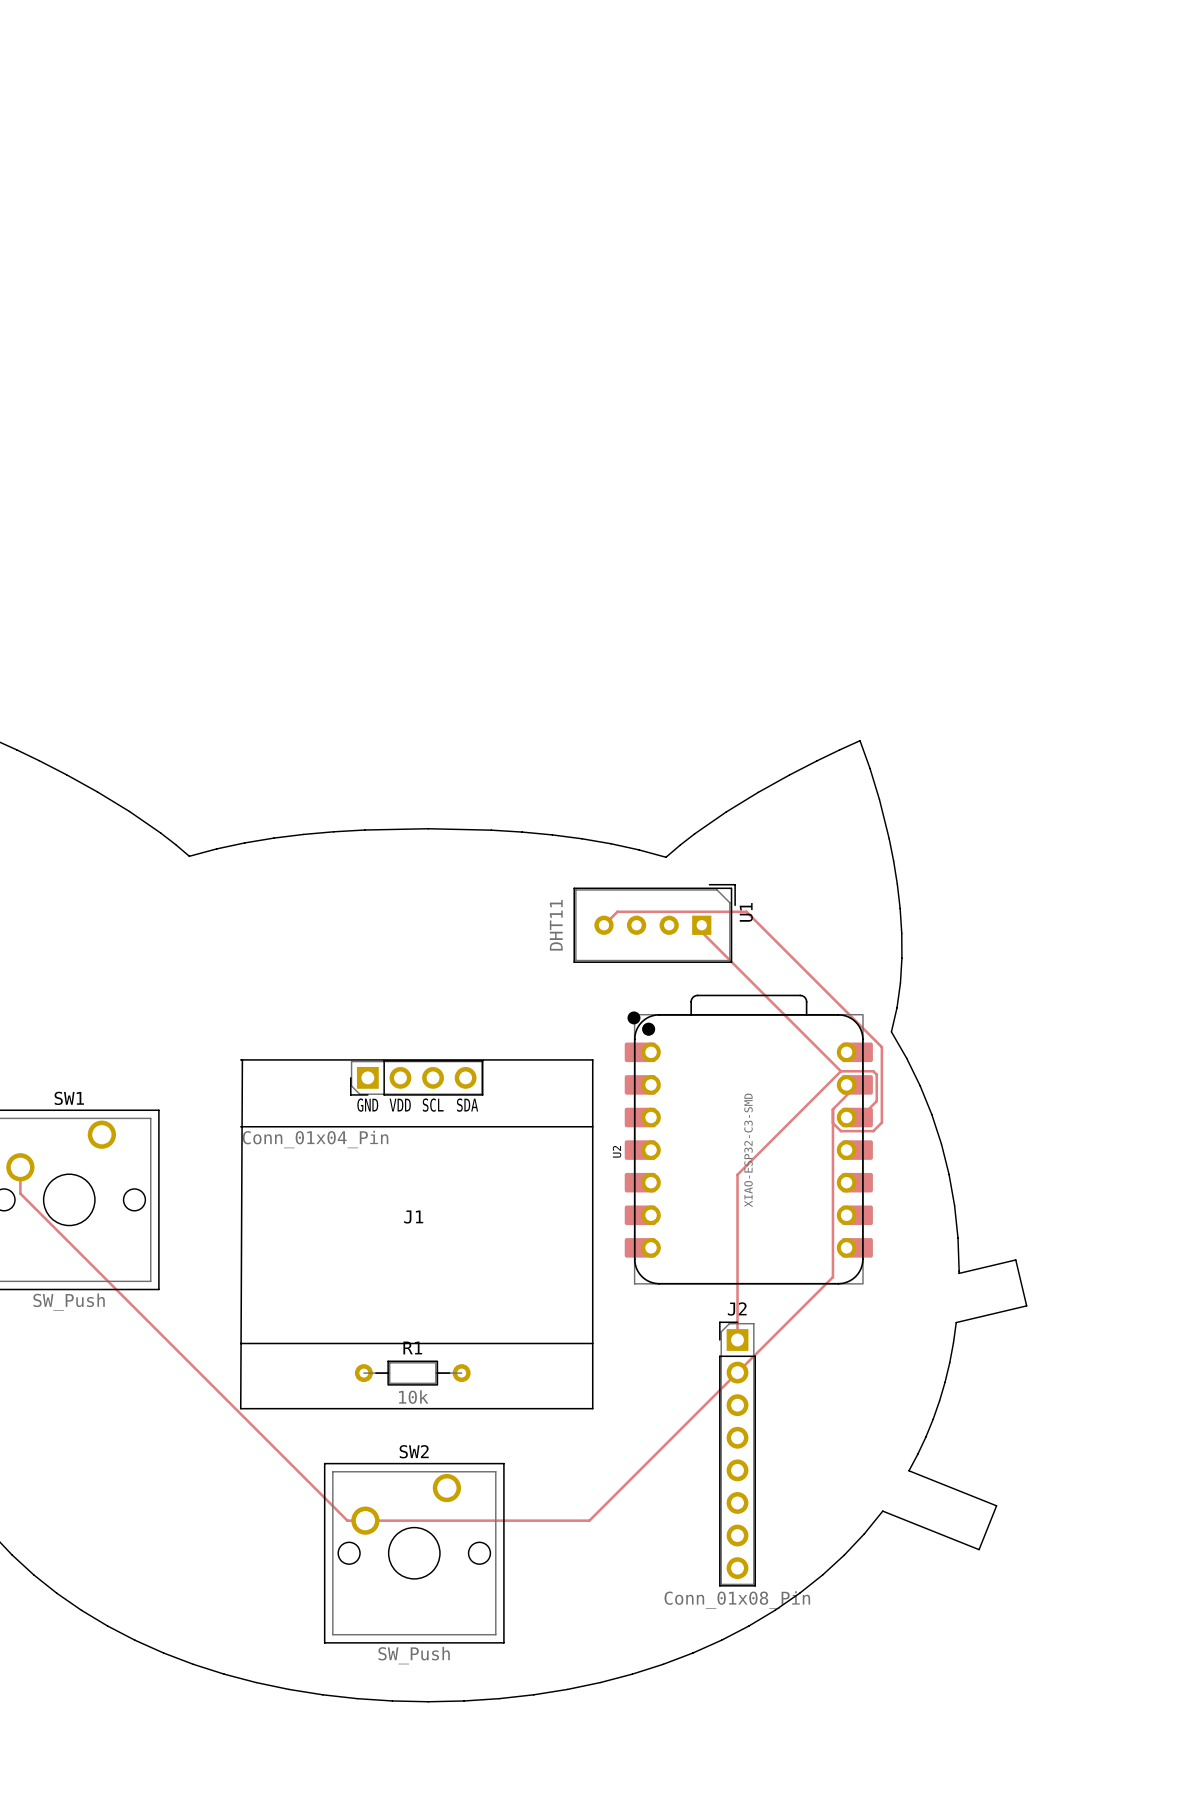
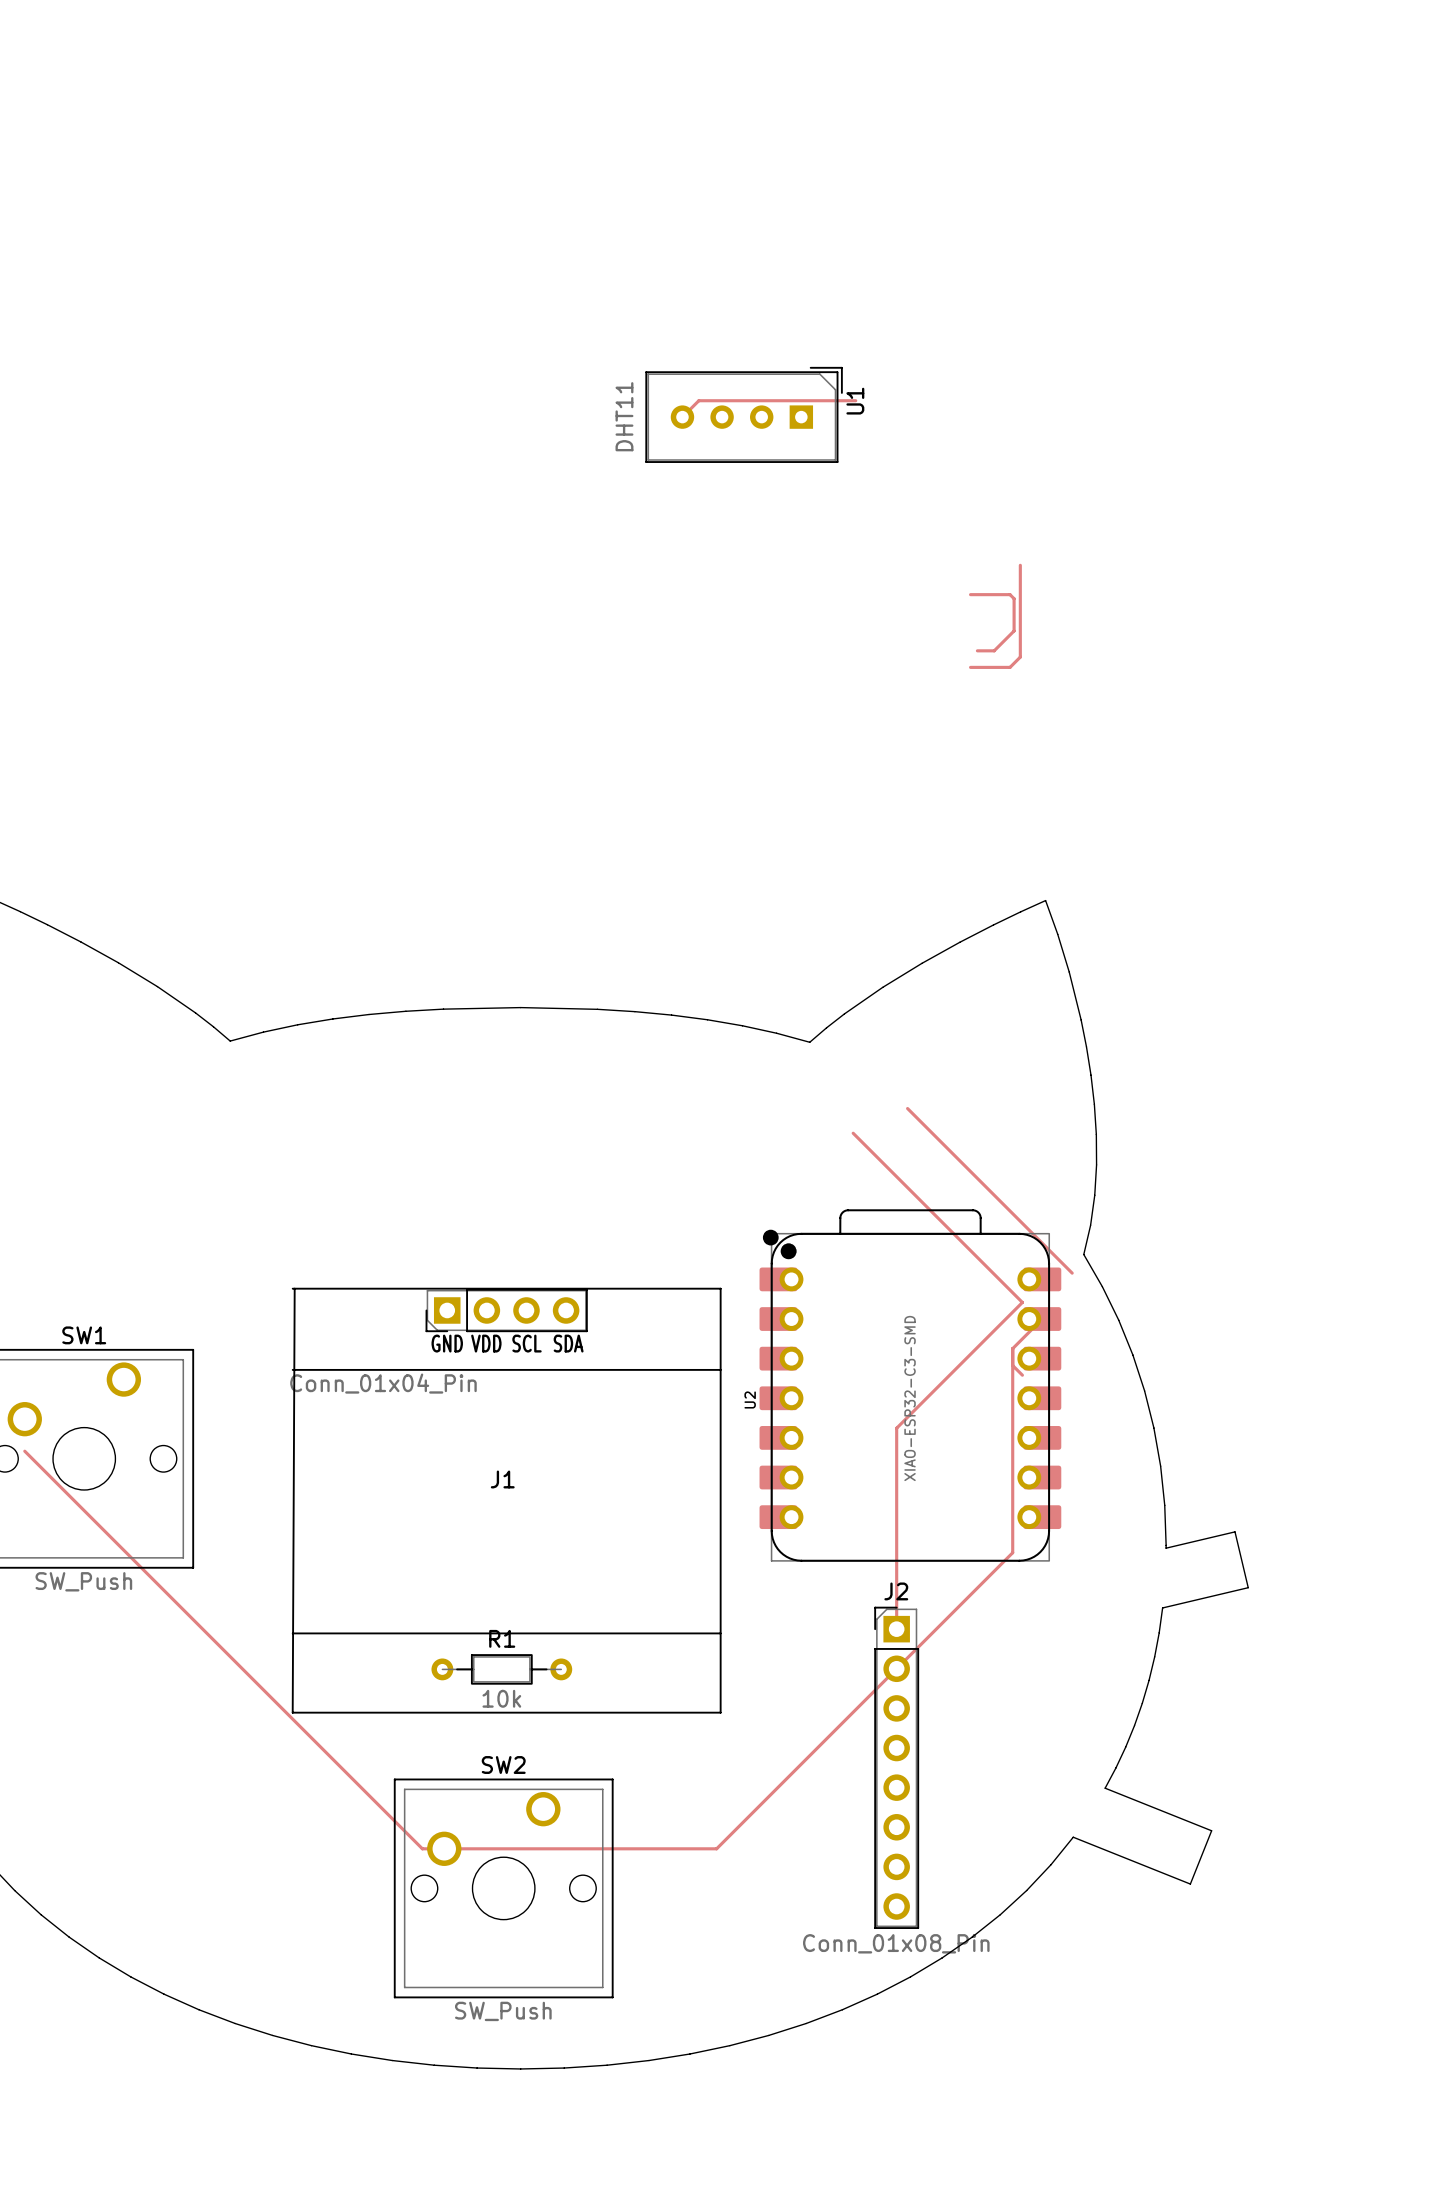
top track: none -> (855, 400) (698, 400) (682, 417)
top track: none -> (1020, 565) (1020, 657) (1010, 667) (970, 667)
top track: none -> (970, 594) (1010, 594) (1014, 598) (1014, 630) (994, 650) (977, 650)
top track: (746, 911) (617, 911) (603, 925) -> none
U1 position: (654, 923) -> (744, 414)
top track: (881, 1047) (881, 1122) (873, 1131) (840, 1131) -> none
top track: (840, 1071) (873, 1071) (876, 1074) (876, 1101) (860, 1117) (846, 1117) -> none
top track: (20, 1167) (20, 1193) -> none

